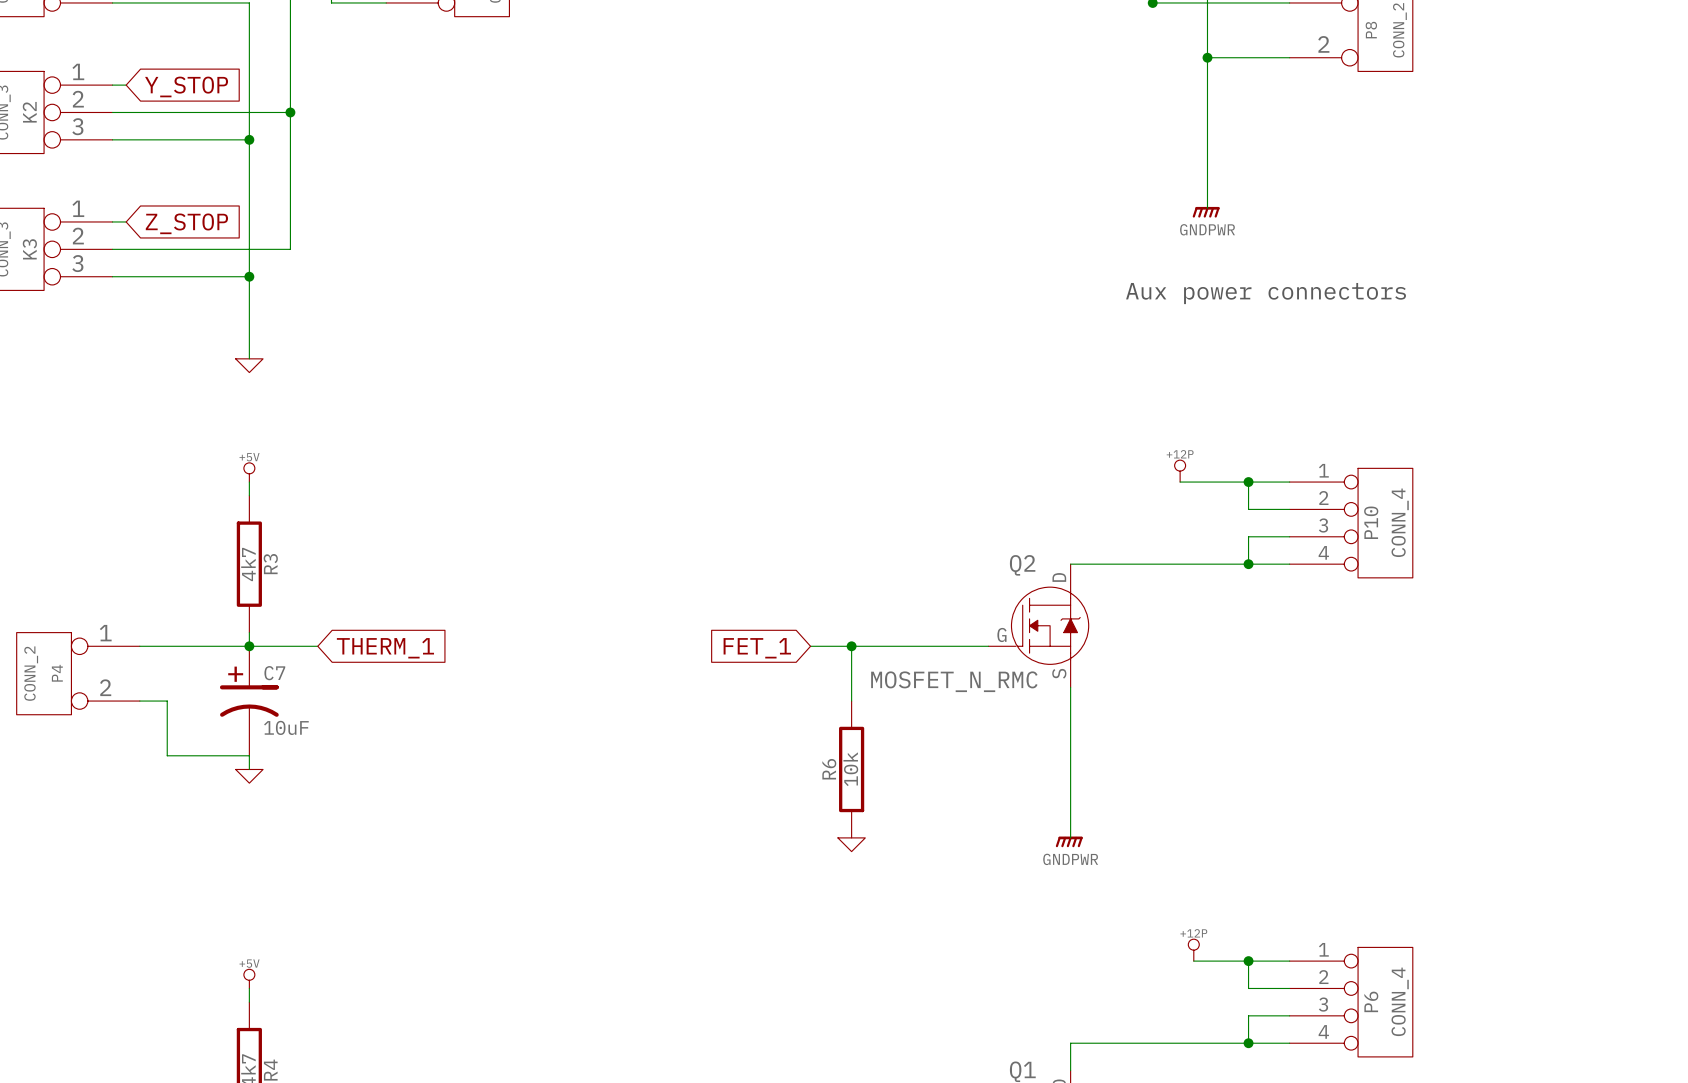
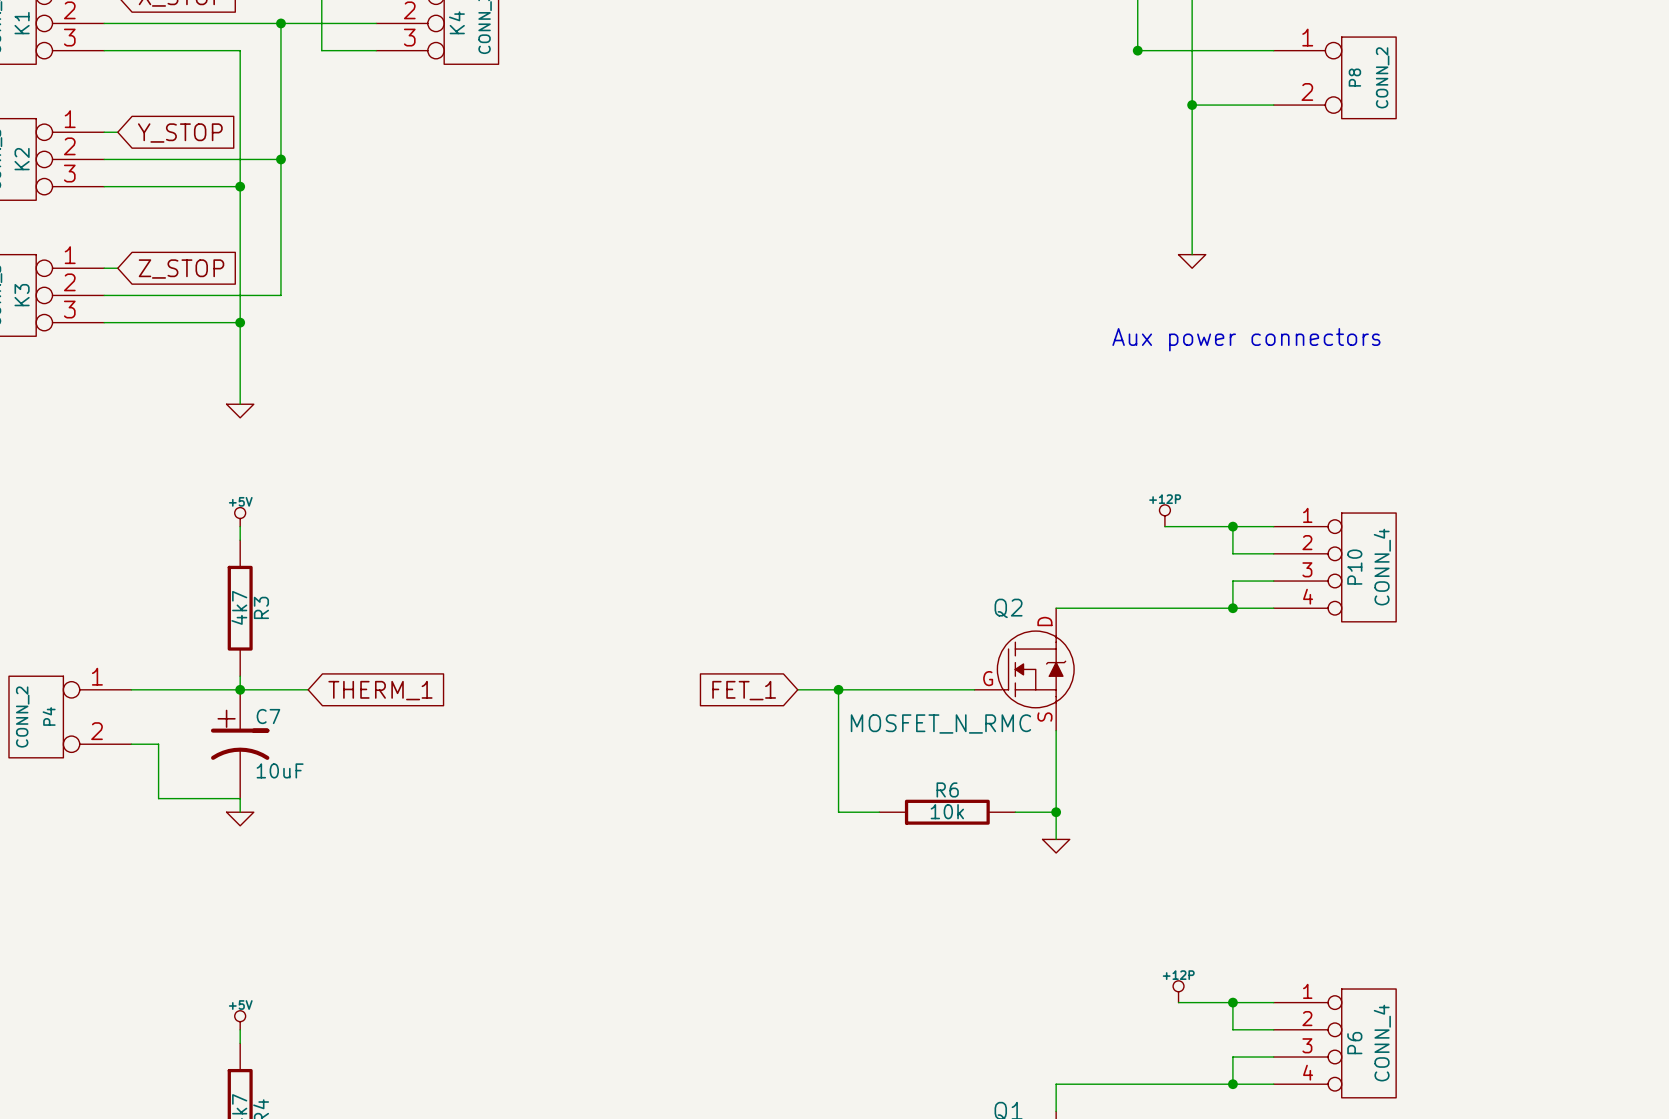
power symbol shape: [1192, 206, 1220, 218] -> [1178, 254, 1206, 269]
power symbol text: GNDPWR (1207, 229) -> none
wire: none -> (838, 744) (838, 812) (879, 812)
R6 rotation: 0° (851, 769) -> 90° clockwise (947, 812)
R6 position: (851, 769) -> (947, 812)
wire: none -> (1015, 812) (1056, 812)
junction: none -> (1056, 812)
wire: (1070, 796) (1070, 837) -> none
power symbol: GNDPWR (1069, 841) -> none
power symbol position: (851, 844) -> (1056, 846)

